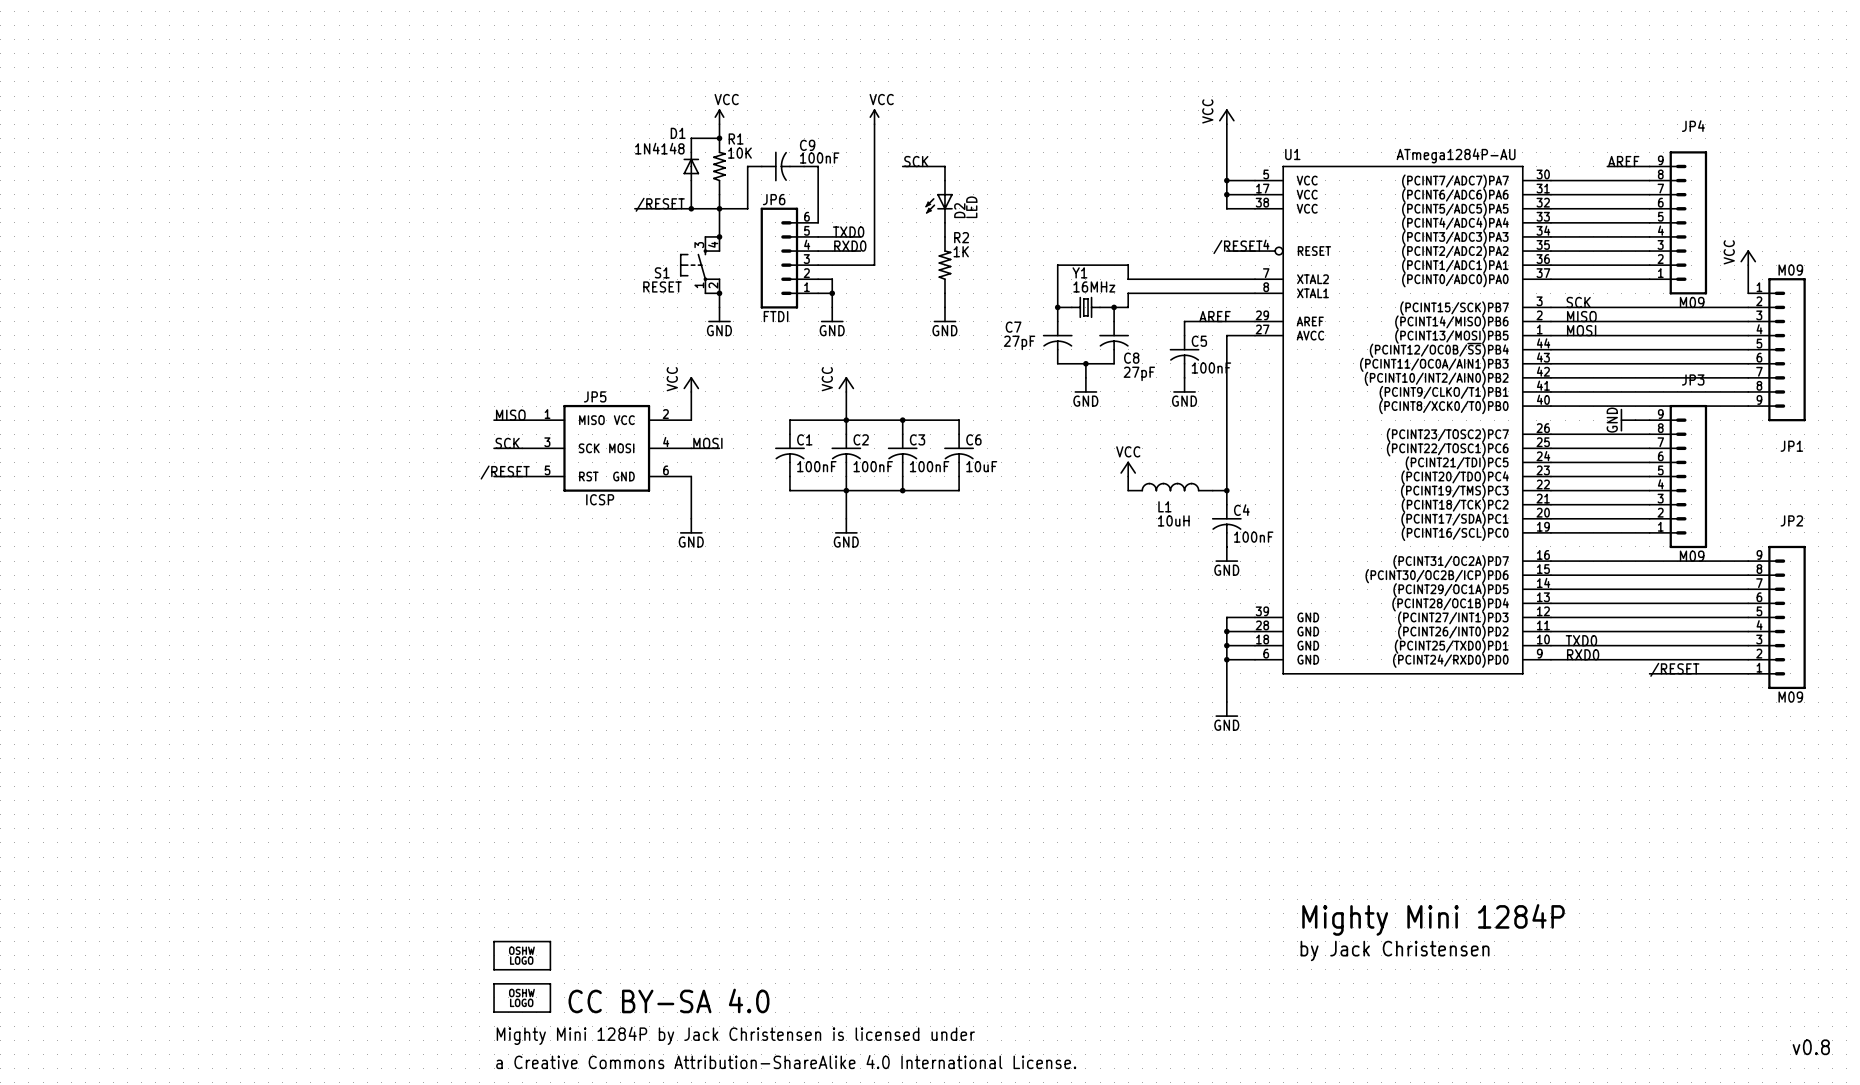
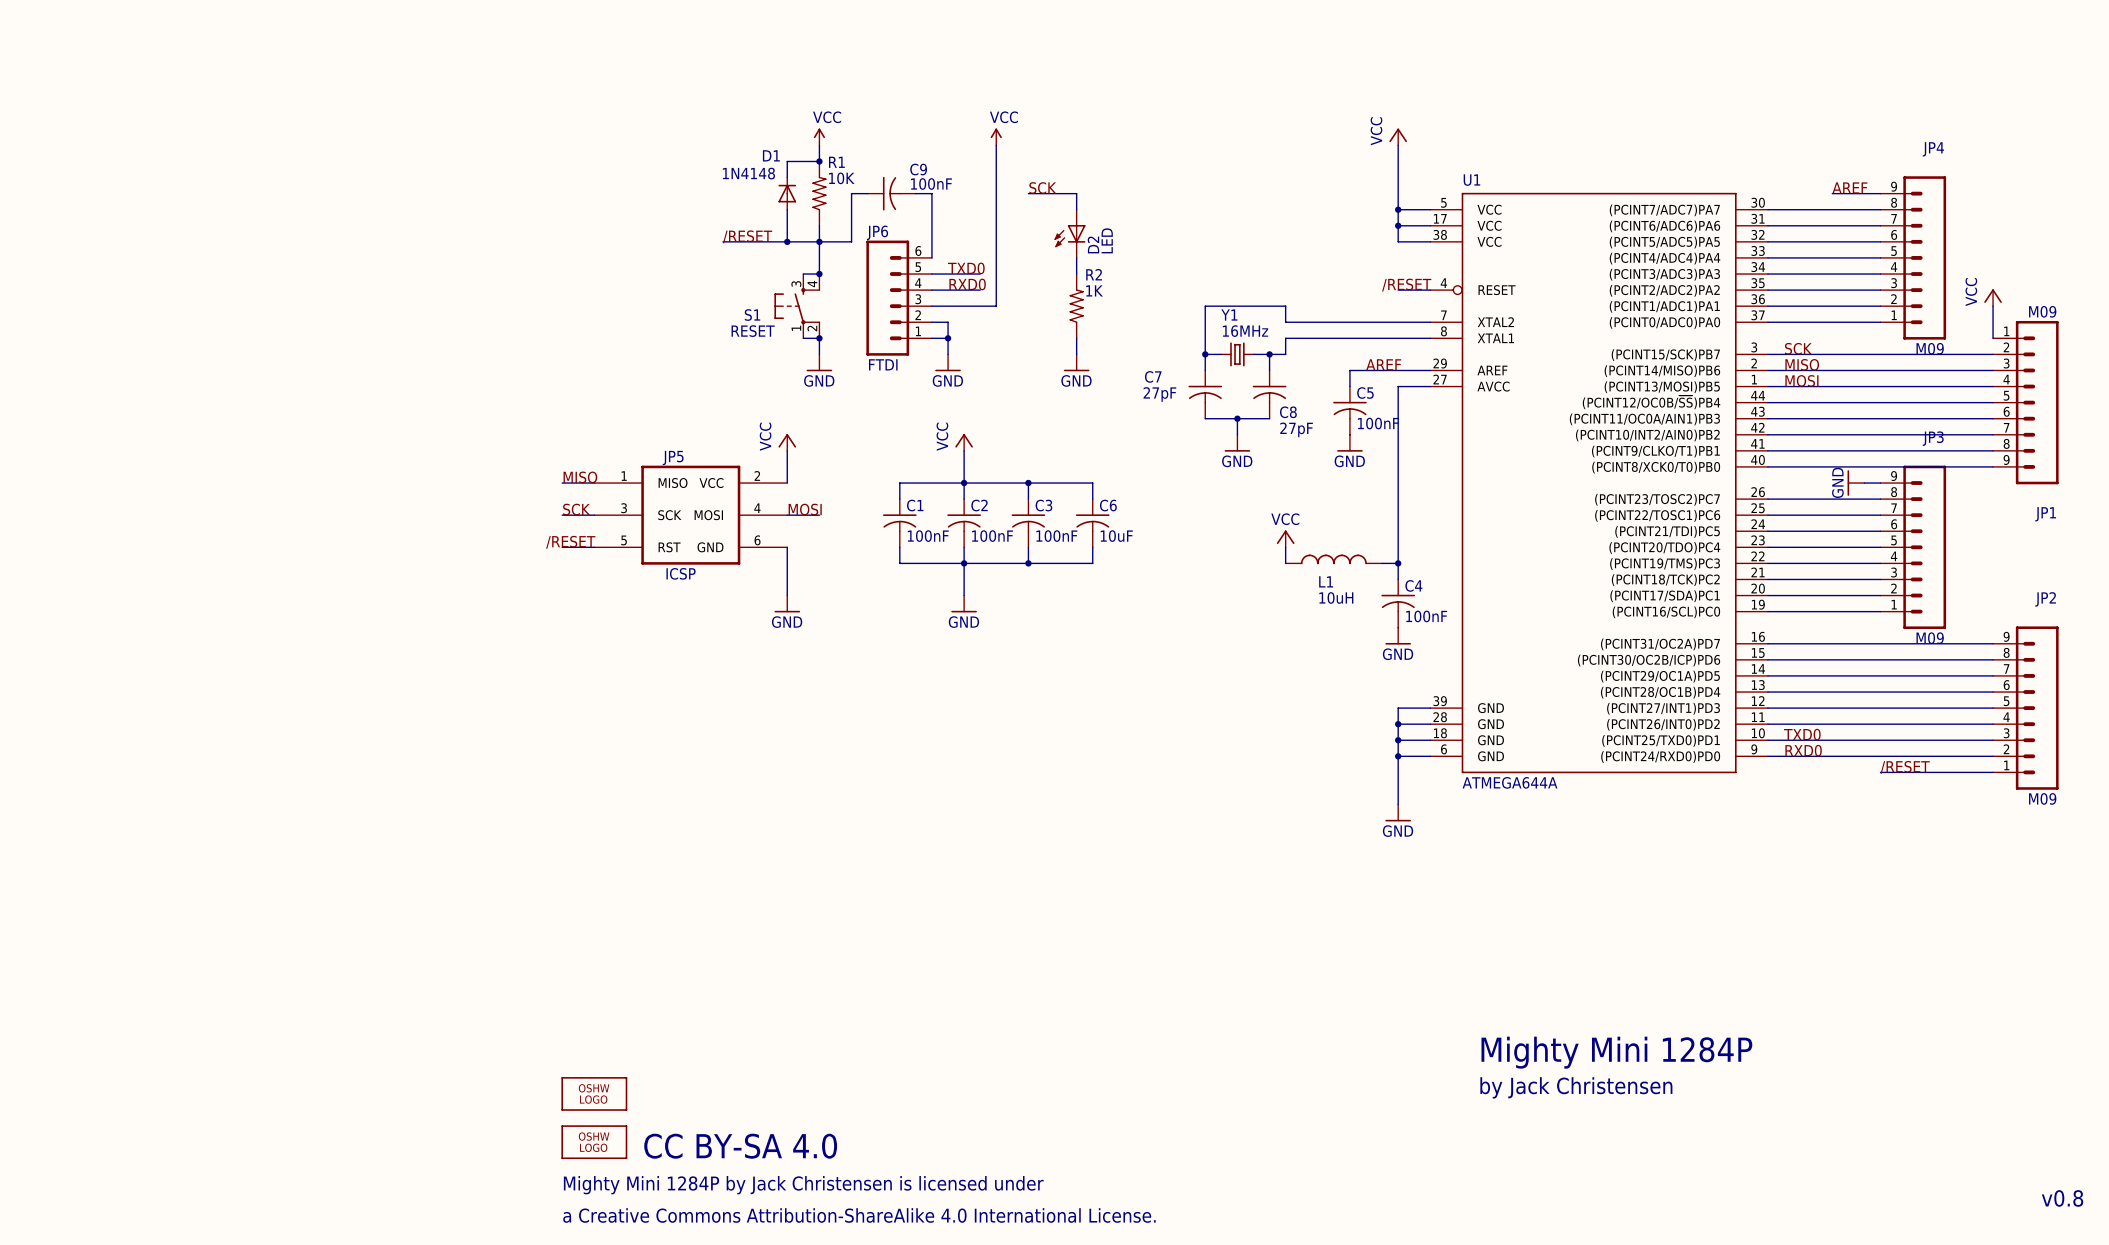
U1 value: ATmega1284P-AU (1456, 155) -> ATMEGA644A (1510, 782)

